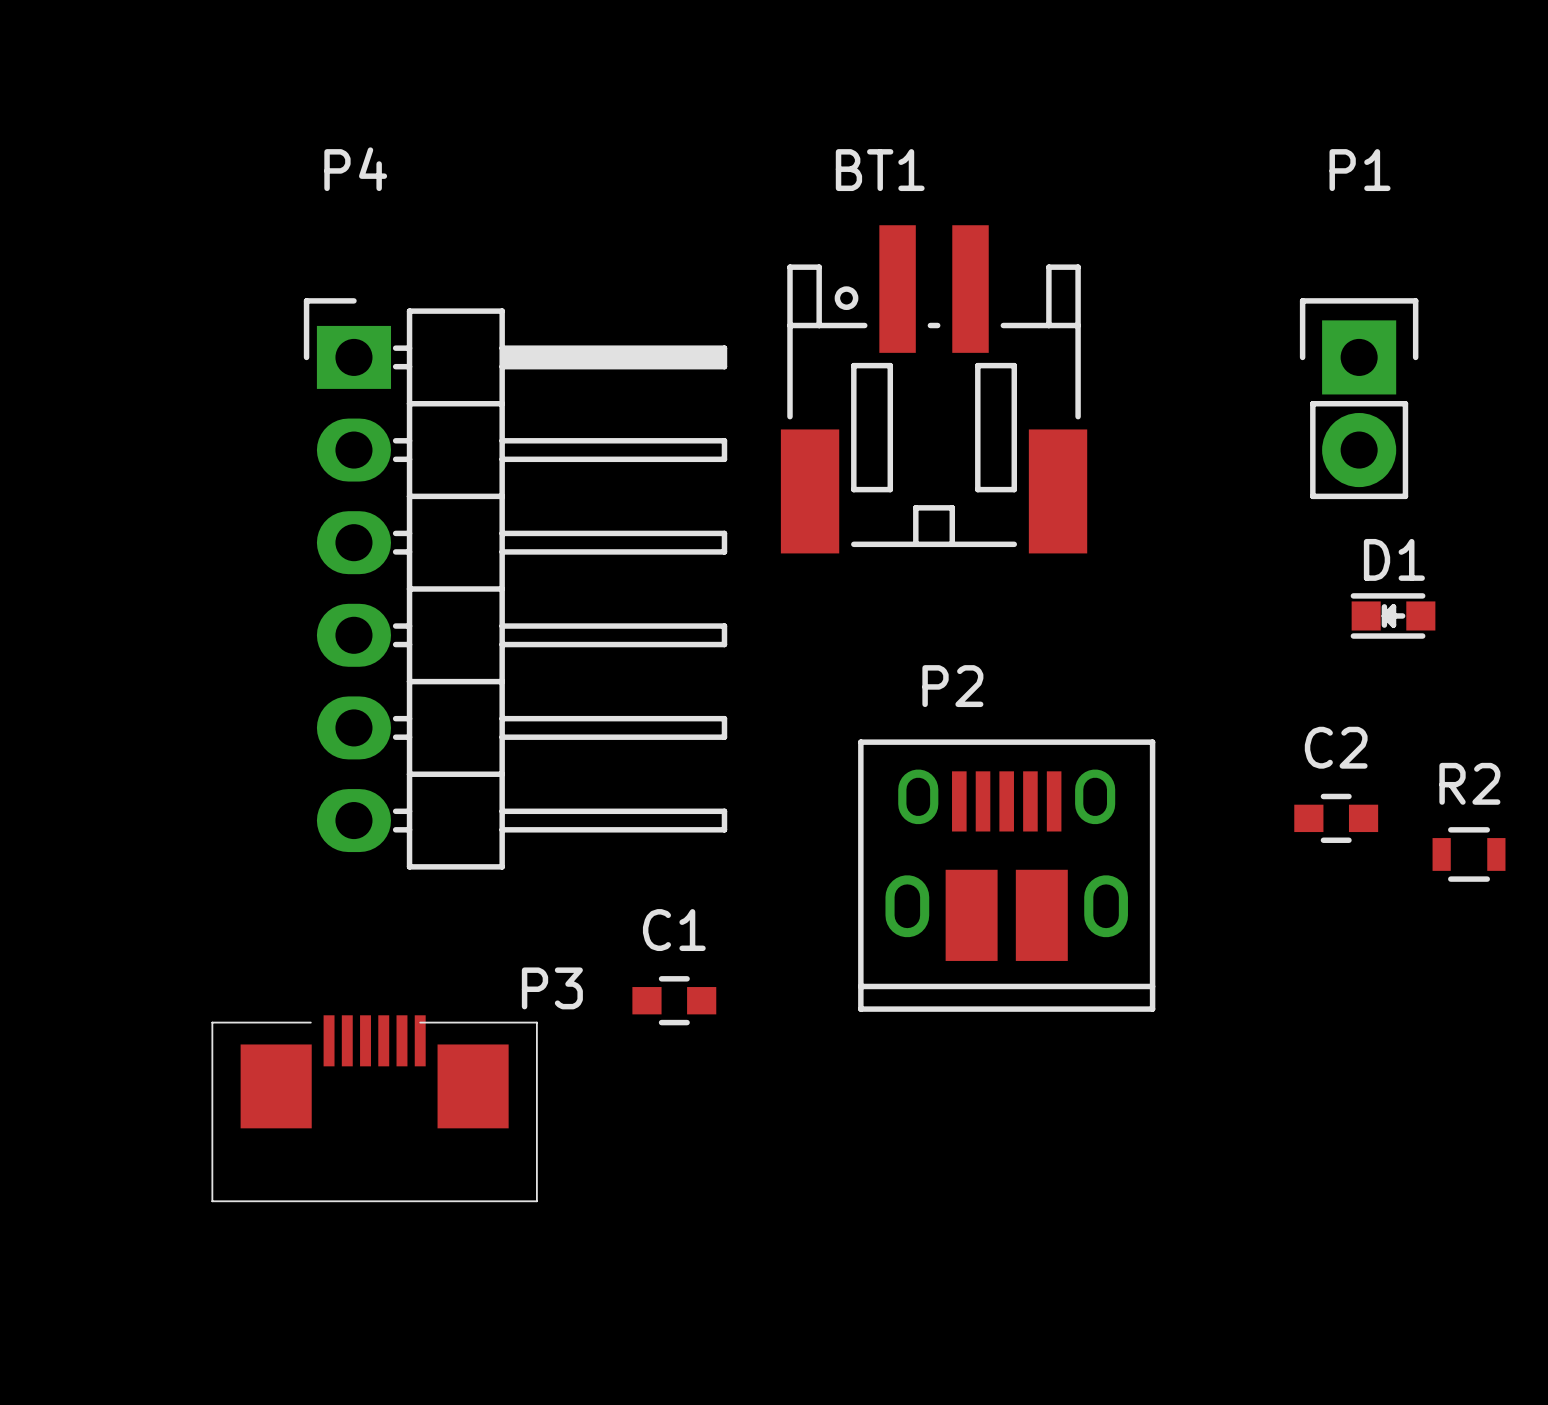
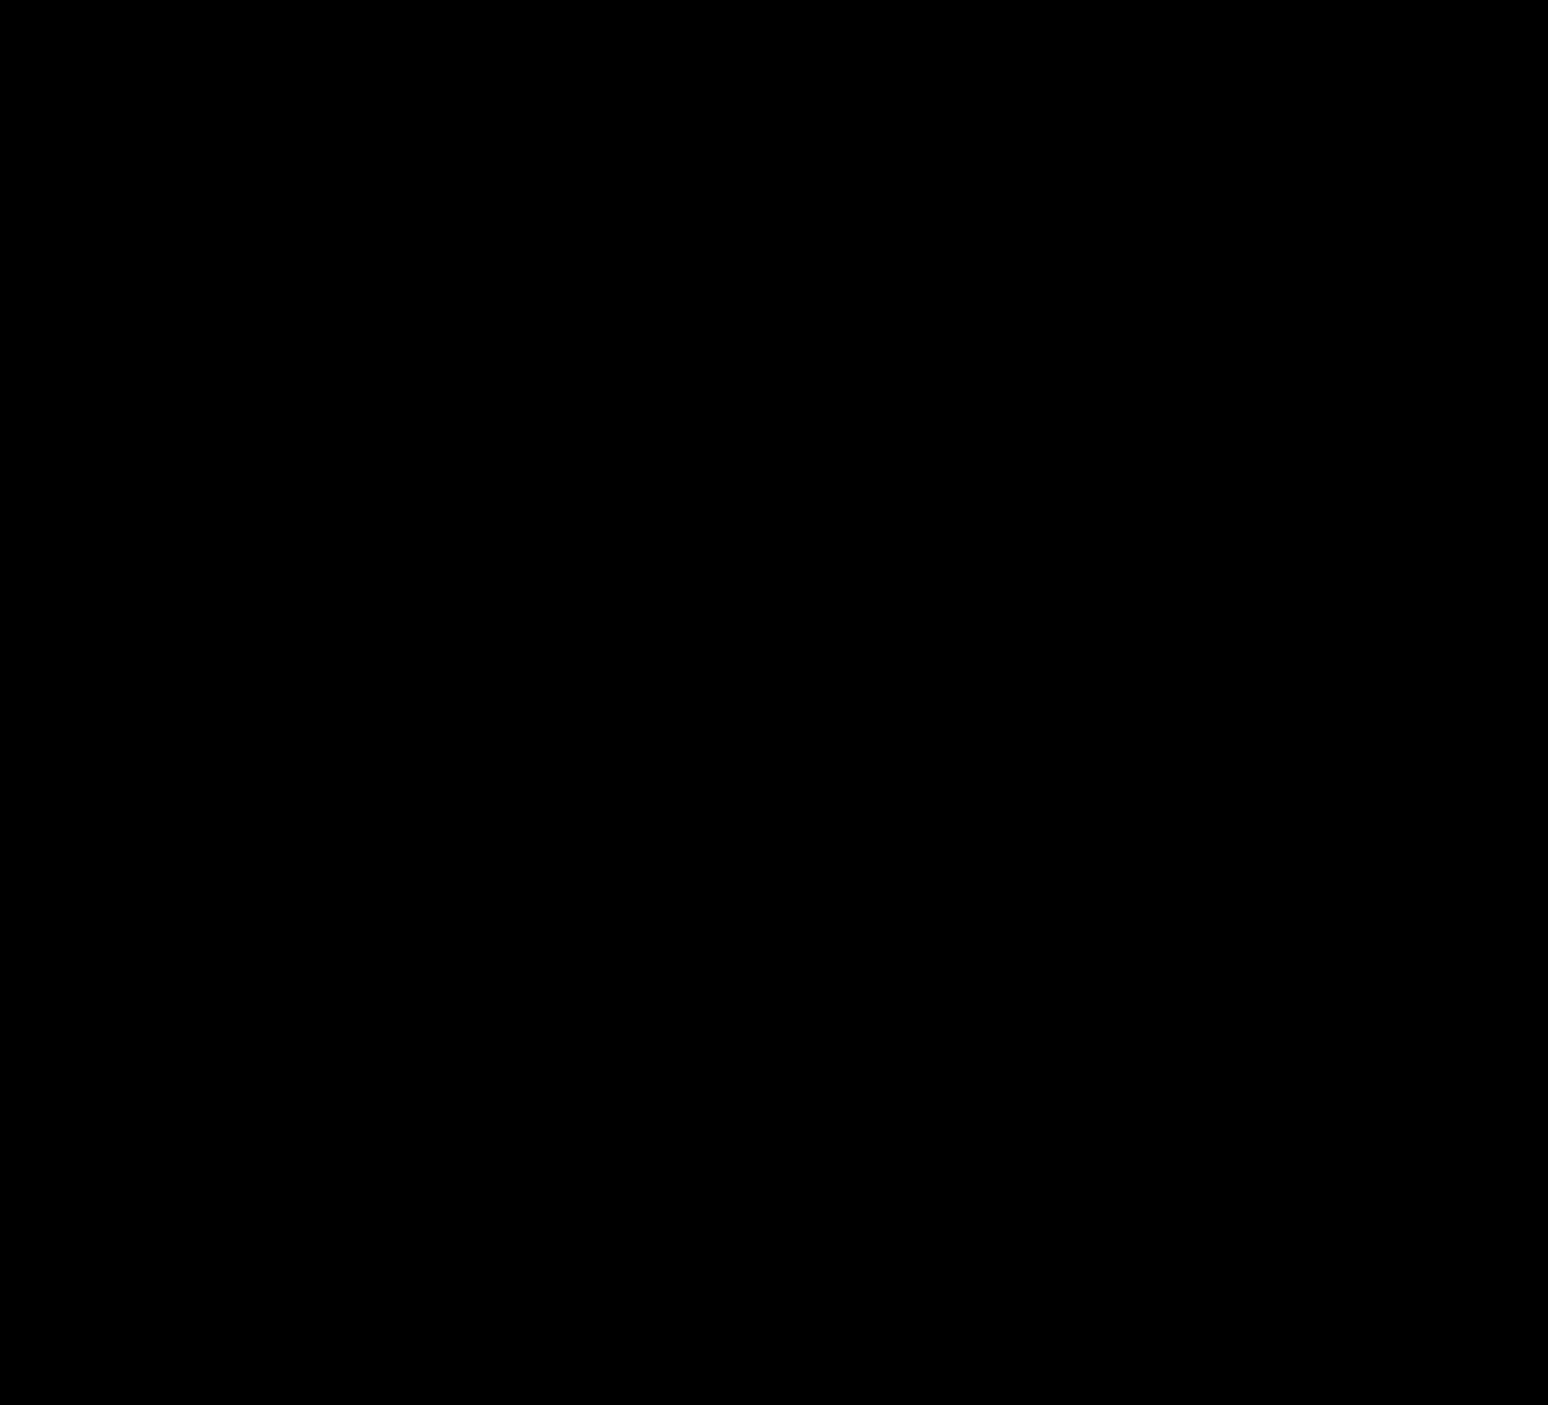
BT1: (934, 389) -> none
P1: (1359, 398) -> none
P4: (515, 583) -> none
D1: (1393, 615) -> none
C2: (1336, 818) -> none
R2: (1469, 854) -> none
P2: (1006, 875) -> none
C1: (674, 1000) -> none
P3: (374, 1108) -> none

